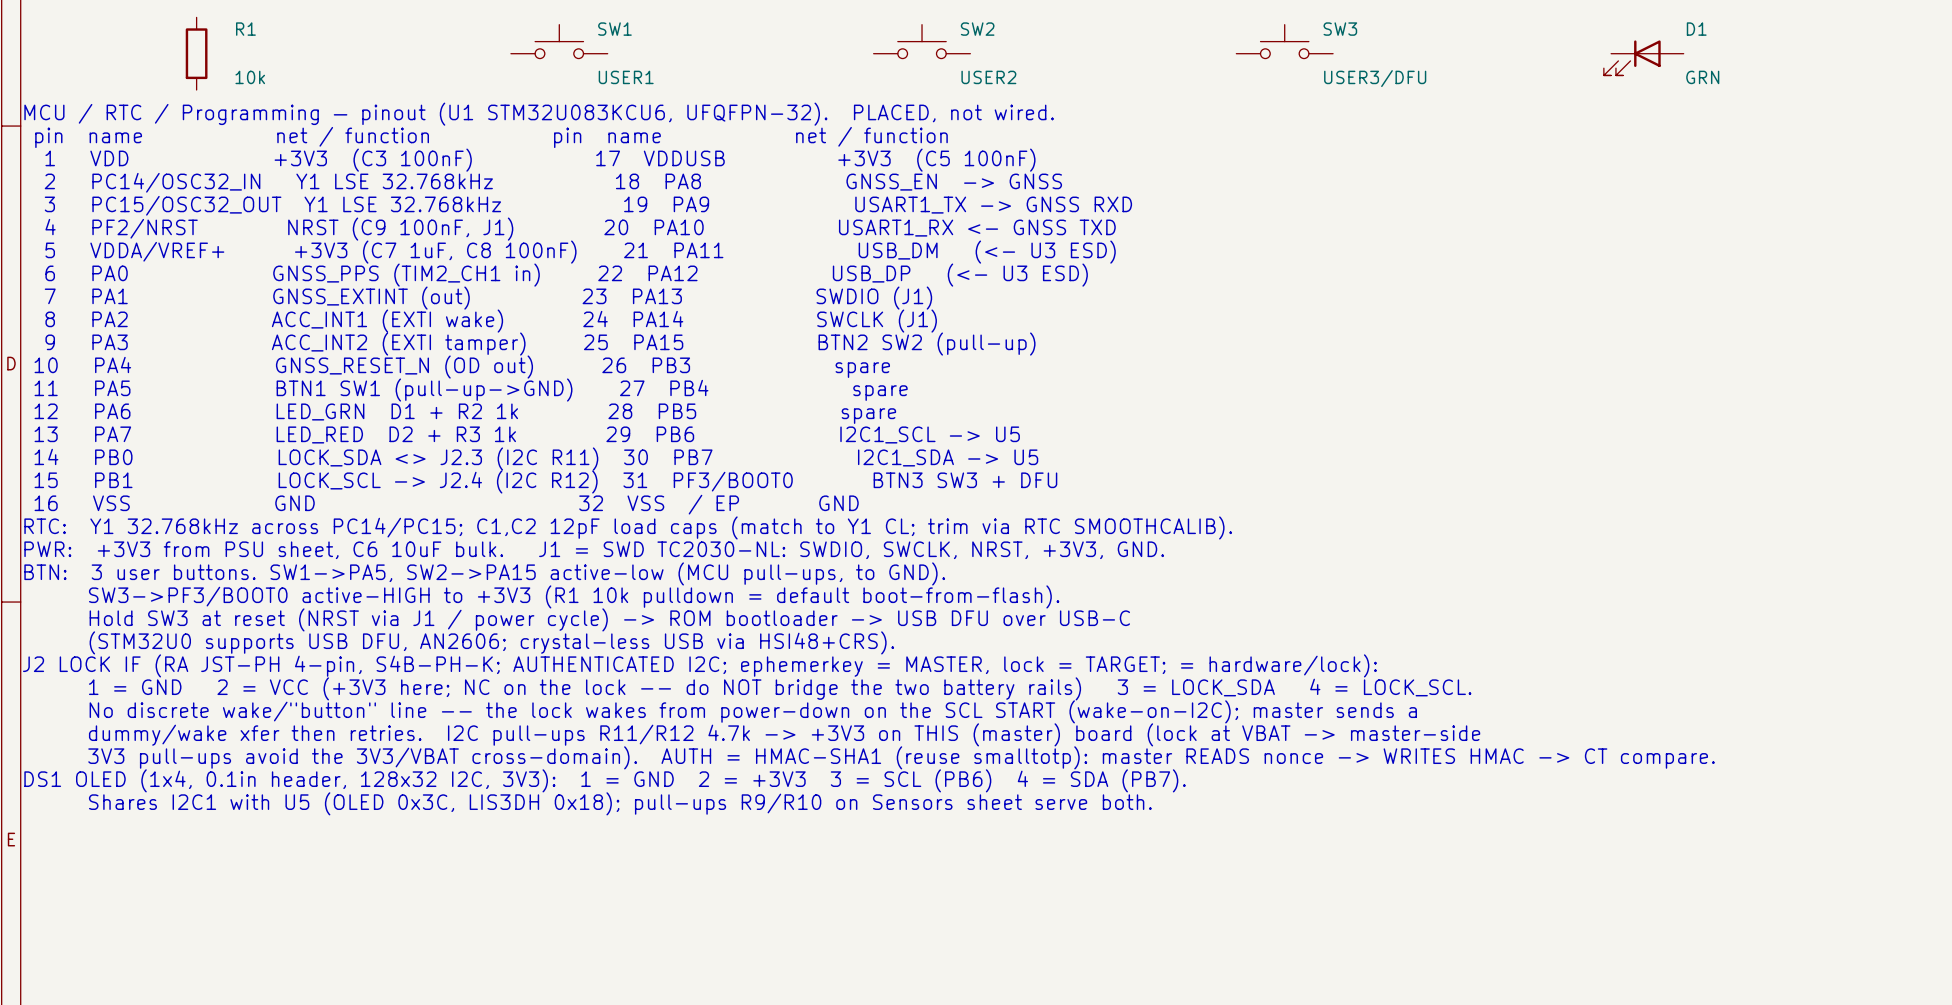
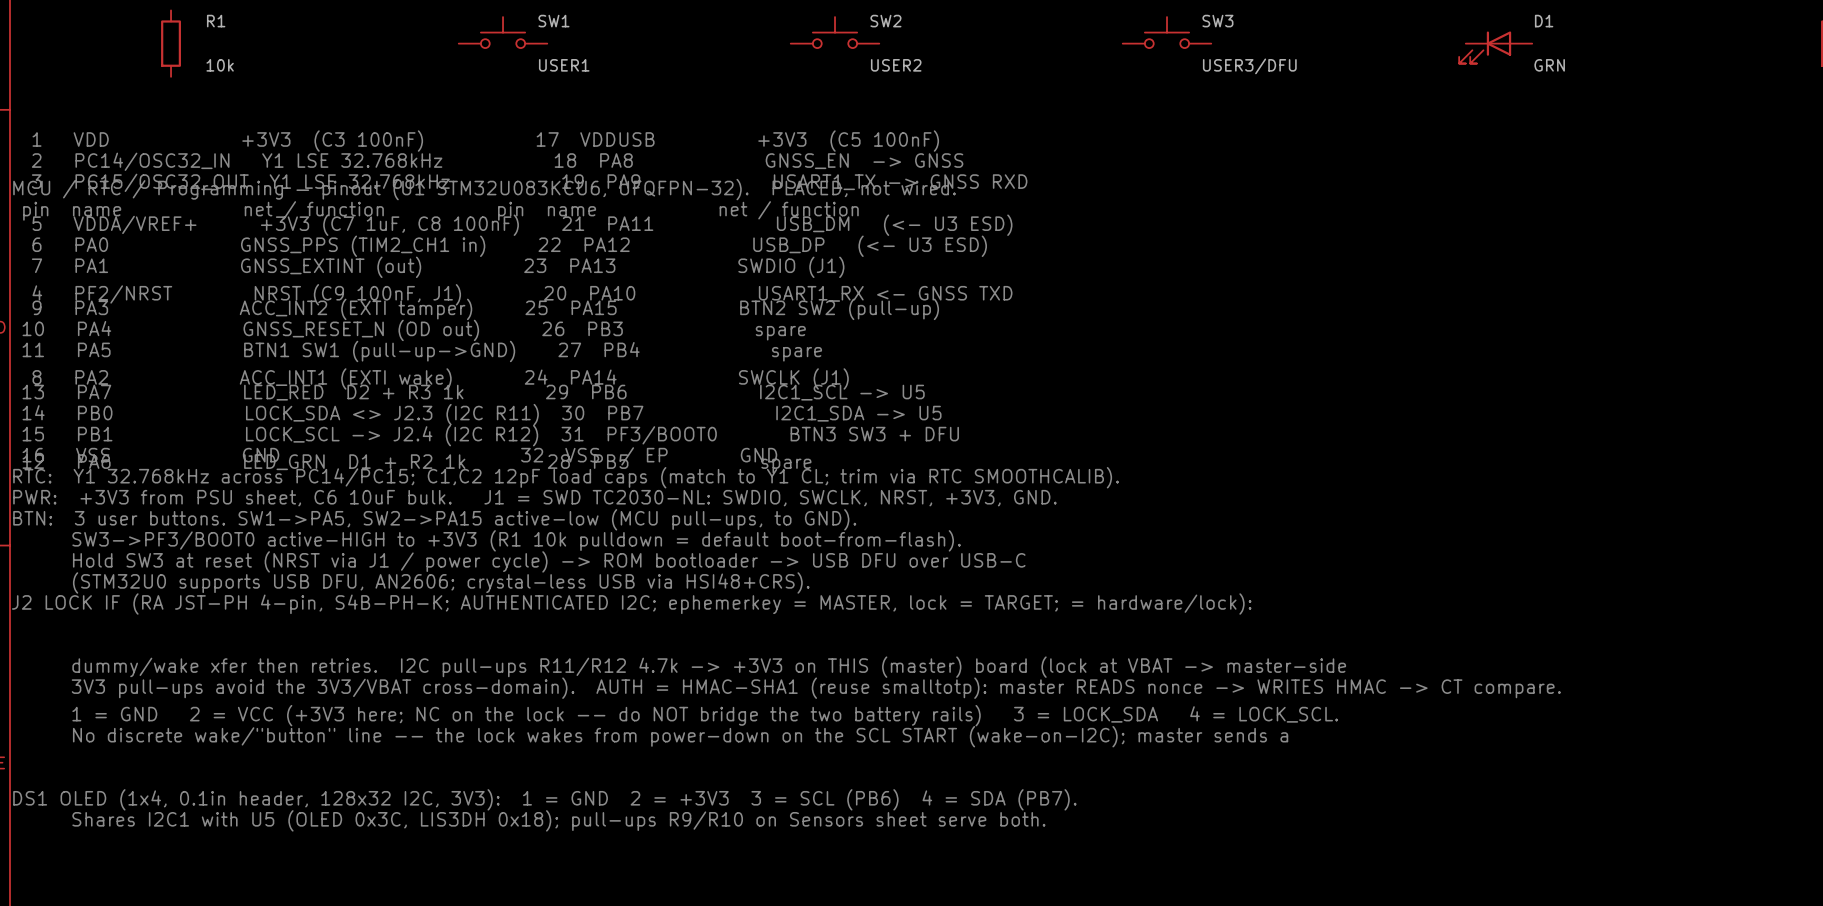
text position: MCU / RTC / Programming — pinout (U1 STM32U083KCU6, UFQFPN-32). PLACED, not wired. (539, 114) -> MCU / RTC / Programming — pinout (U1 STM32U083KCU6, UFQFPN-32). PLACED, not wired. (484, 189)
text position: pin name net / function pin name net / function (491, 137) -> pin name net / function pin name net / function (440, 210)
text position: 4 PF2/NRST NRST (C9 100nF, J1) 20 PA10 USART1_RX <- GNSS TXD (580, 229) -> 4 PF2/NRST NRST (C9 100nF, J1) 20 PA10 USART1_RX <- GNSS TXD (522, 294)
text position: 8 PA2 ACC_INT1 (EXTI wake) 24 PA14 SWCLK (J1) (491, 321) -> 8 PA2 ACC_INT1 (EXTI wake) 24 PA14 SWCLK (J1) (440, 378)
text position: 12 PA6 LED_GRN D1 + R2 1k 28 PB5 spare (465, 413) -> 12 PA6 LED_GRN D1 + R2 1k 28 PB5 spare (416, 463)
text position: 1 = GND 2 = VCC (+3V3 here; NC on the lock -- do NOT bridge the two battery rails) 3 = LOCK_SDA 4 = LOCK_SCL. (780, 688) -> 1 = GND 2 = VCC (+3V3 here; NC on the lock -- do NOT bridge the two battery rails) 3 = LOCK_SDA 4 = LOCK_SCL. (705, 715)
text position: No discrete wake/"button" line -- the lock wakes from power-down on the SCL START (wake-on-I2C); master sends a (753, 711) -> No discrete wake/"button" line -- the lock wakes from power-down on the SCL START (wake-on-I2C); master sends a (680, 736)
text position: DS1 OLED (1x4, 0.1in header, 128x32 I2C, 3V3): 1 = GND 2 = +3V3 3 = SCL (PB6) 4 = SDA (PB7). (605, 780) -> DS1 OLED (1x4, 0.1in header, 128x32 I2C, 3V3): 1 = GND 2 = +3V3 3 = SCL (PB6) 4 = SDA (PB7). (544, 799)
text position: Shares I2C1 with U5 (OLED 0x3C, LIS3DH 0x18); pull-ups R9/R10 on Sensors sheet serve both. (620, 803) -> Shares I2C1 with U5 (OLED 0x3C, LIS3DH 0x18); pull-ups R9/R10 on Sensors sheet serve both. (558, 820)

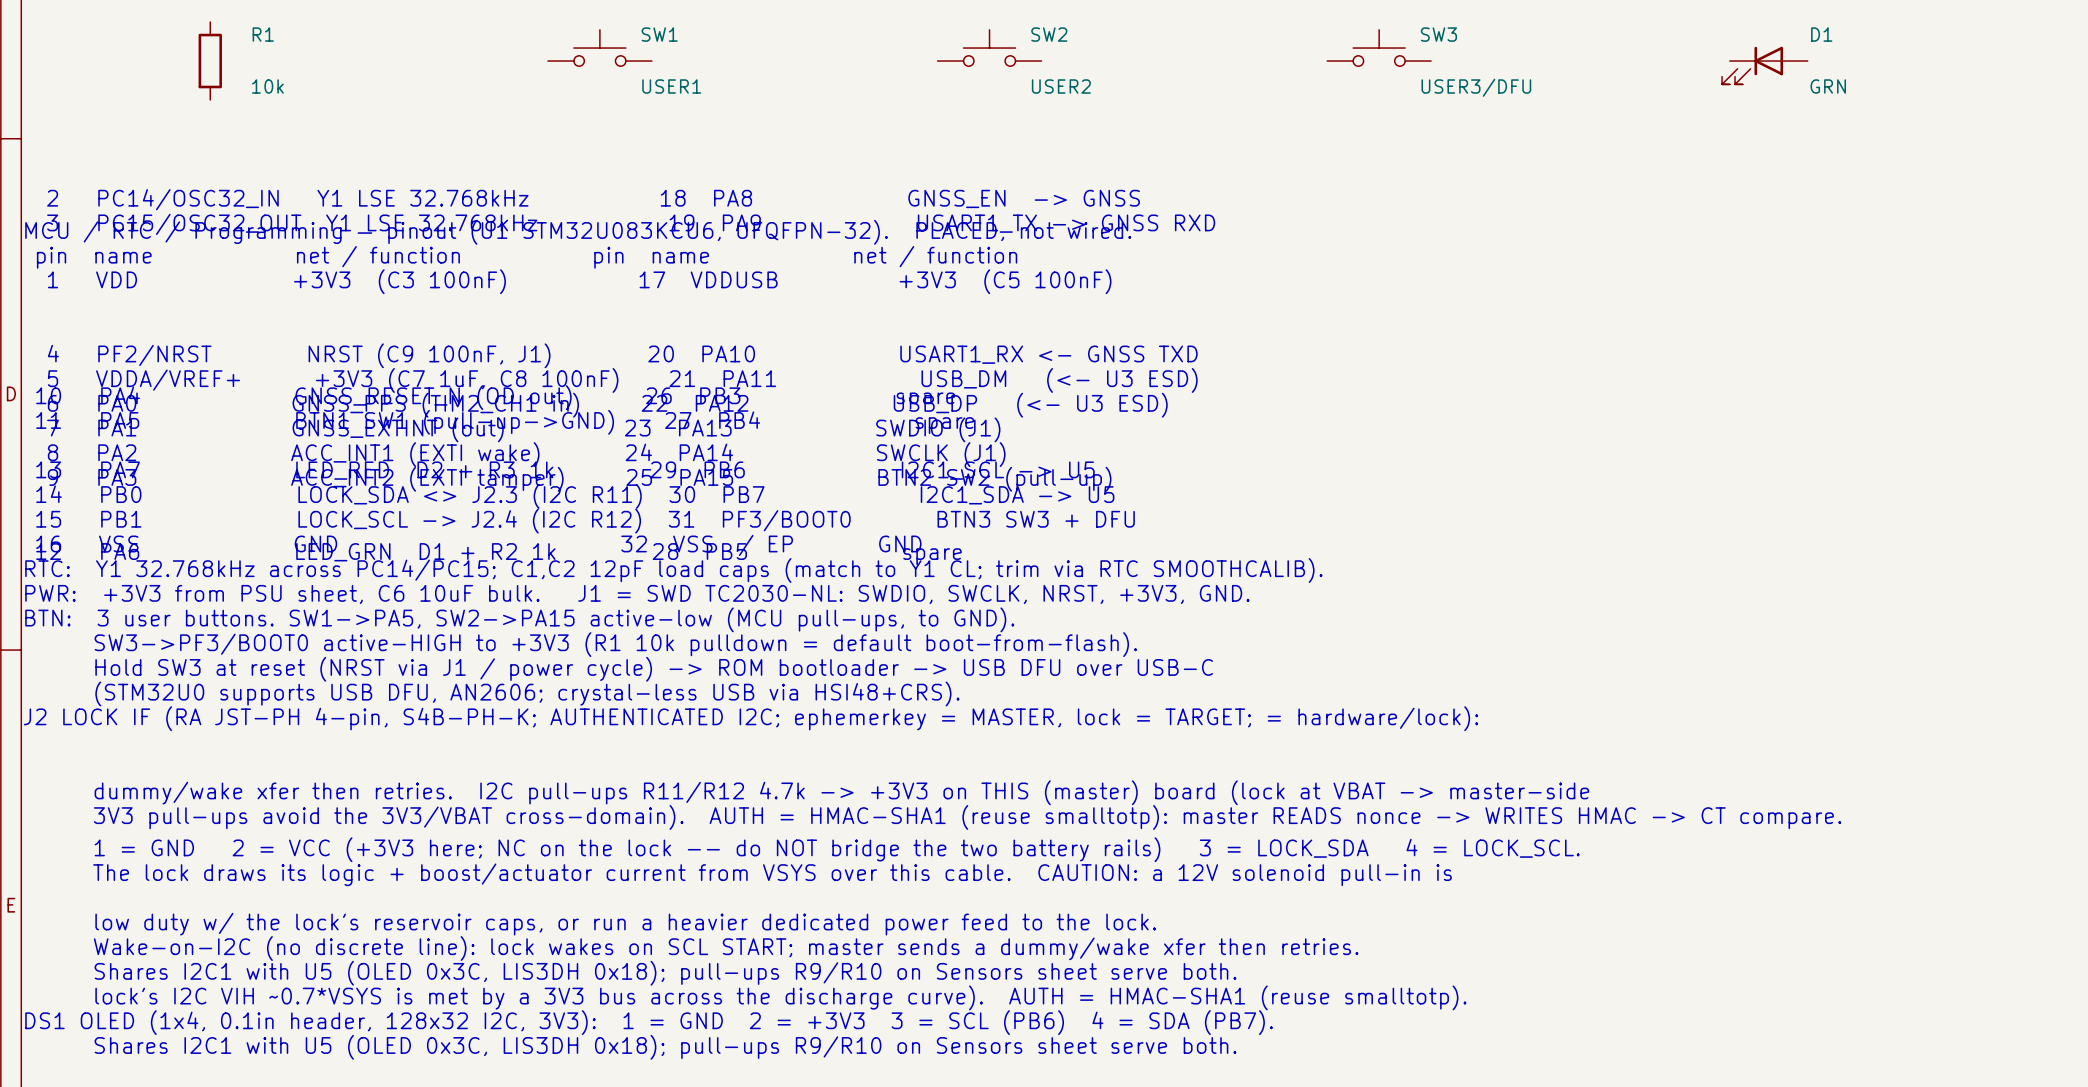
text position: 1 VDD +3V3 (C3 100nF) 17 VDDUSB +3V3 (C5 100nF) (485, 141) -> 1 VDD +3V3 (C3 100nF) 17 VDDUSB +3V3 (C5 100nF) (579, 281)
text position: 5 VDDA/VREF+ +3V3 (C7 1uF, C8 100nF) 21 PA11 USB_DM (<- U3 ESD) (522, 225) -> 5 VDDA/VREF+ +3V3 (C7 1uF, C8 100nF) 21 PA11 USB_DM (<- U3 ESD) (622, 380)
text position: 6 PA0 GNSS_PPS (TIM2_CH1 in) 22 PA12 USB_DP (<- U3 ESD) (509, 246) -> 6 PA0 GNSS_PPS (TIM2_CH1 in) 22 PA12 USB_DP (<- U3 ESD) (607, 405)
text position: 7 PA1 GNSS_EXTINT (out) 23 PA13 SWDIO (J1) (438, 267) -> 7 PA1 GNSS_EXTINT (out) 23 PA13 SWDIO (J1) (523, 429)
text position: 9 PA3 ACC_INT2 (EXTI tamper) 25 PA15 BTN2 SW2 (pull-up) (485, 309) -> 9 PA3 ACC_INT2 (EXTI tamper) 25 PA15 BTN2 SW2 (pull-up) (579, 479)
text: No discrete wake/"button" line -- the lock wakes from power-down on the SCL START (wake-on-I2C); master sends a (680, 736) -> The lock draws its logic + boost/actuator current from VSYS over this cable. CAUTION: a 12V solenoid pull-in is (772, 874)
text: none -> low duty w/ the lock's reservoir caps, or run a heavier dedicated power feed to the lock. (625, 924)
text: DS1 OLED (1x4, 0.1in header, 128x32 I2C, 3V3): 1 = GND 2 = +3V3 3 = SCL (PB6) 4 = SDA (PB7). (544, 799) -> Wake-on-I2C (no discrete line): lock wakes on SCL START; master sends a dummy/wake xfer then retries. (726, 948)
text: none -> lock's I2C VIH ~0.7*VSYS is met by a 3V3 bus across the discharge curve). AUTH = HMAC-SHA1 (reuse smalltotp). (780, 997)
text: none -> DS1 OLED (1x4, 0.1in header, 128x32 I2C, 3V3): 1 = GND 2 = +3V3 3 = SCL (PB6) 4 = SDA (PB7). (649, 1022)
text: none -> Shares I2C1 with U5 (OLED 0x3C, LIS3DH 0x18); pull-ups R9/R10 on Sensors sheet serve both. (665, 1047)

